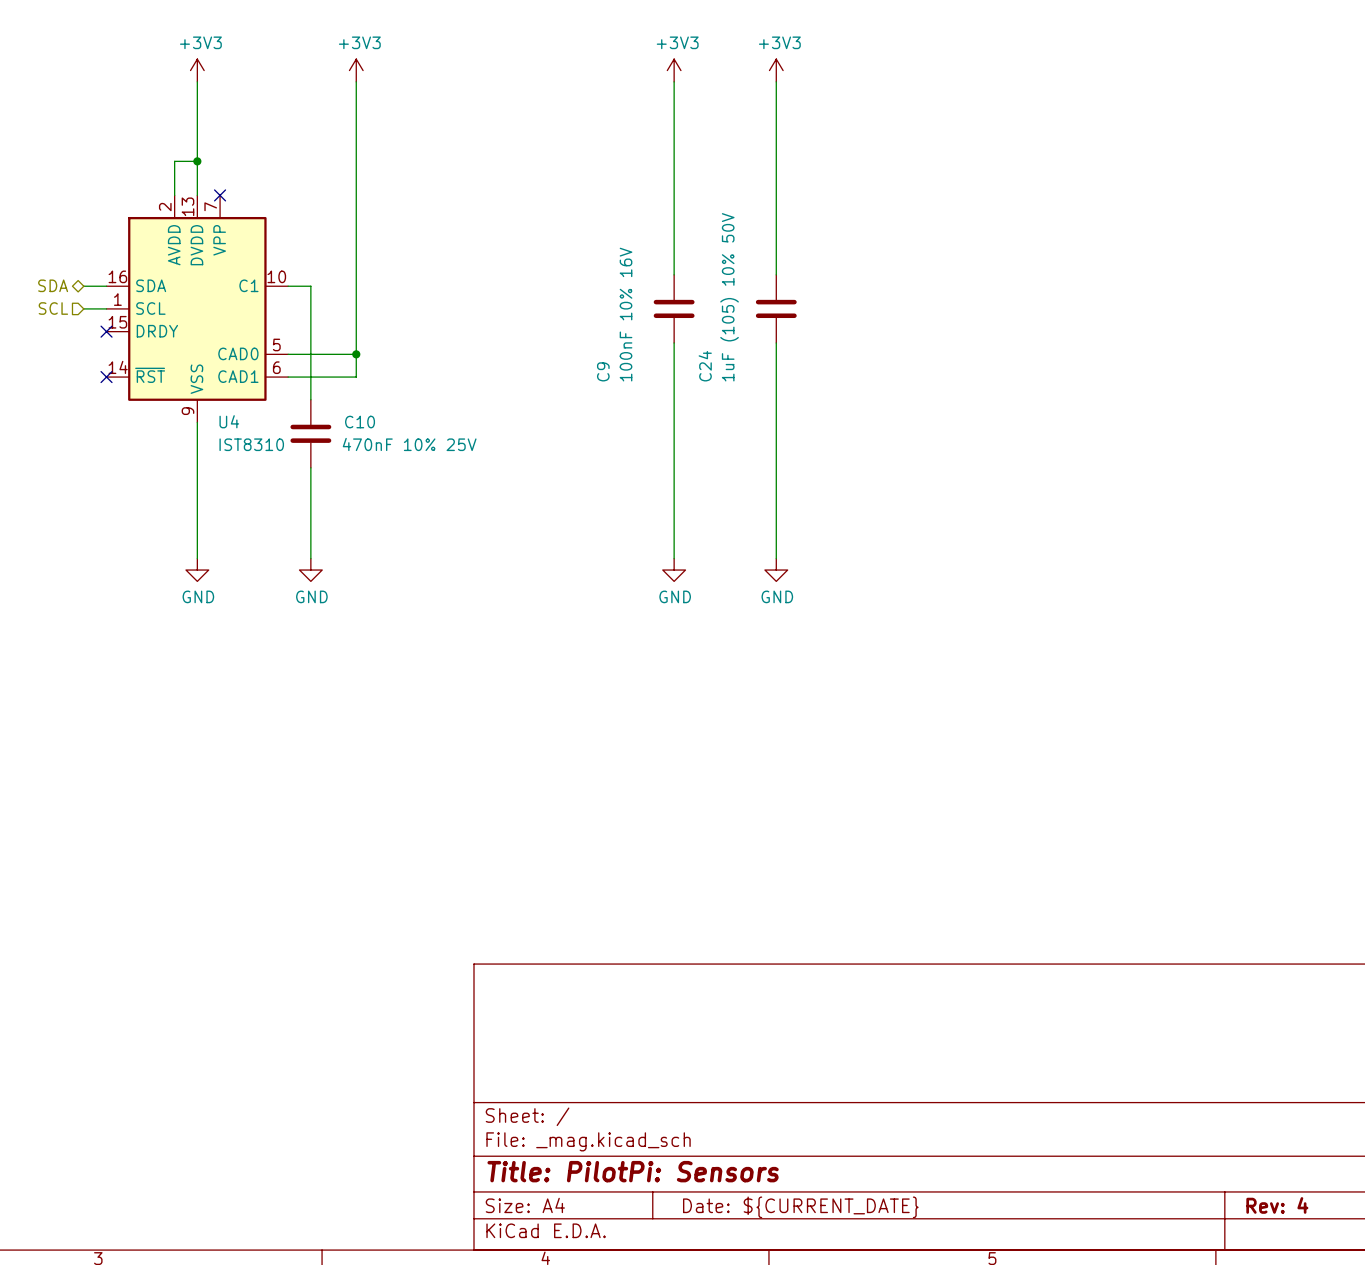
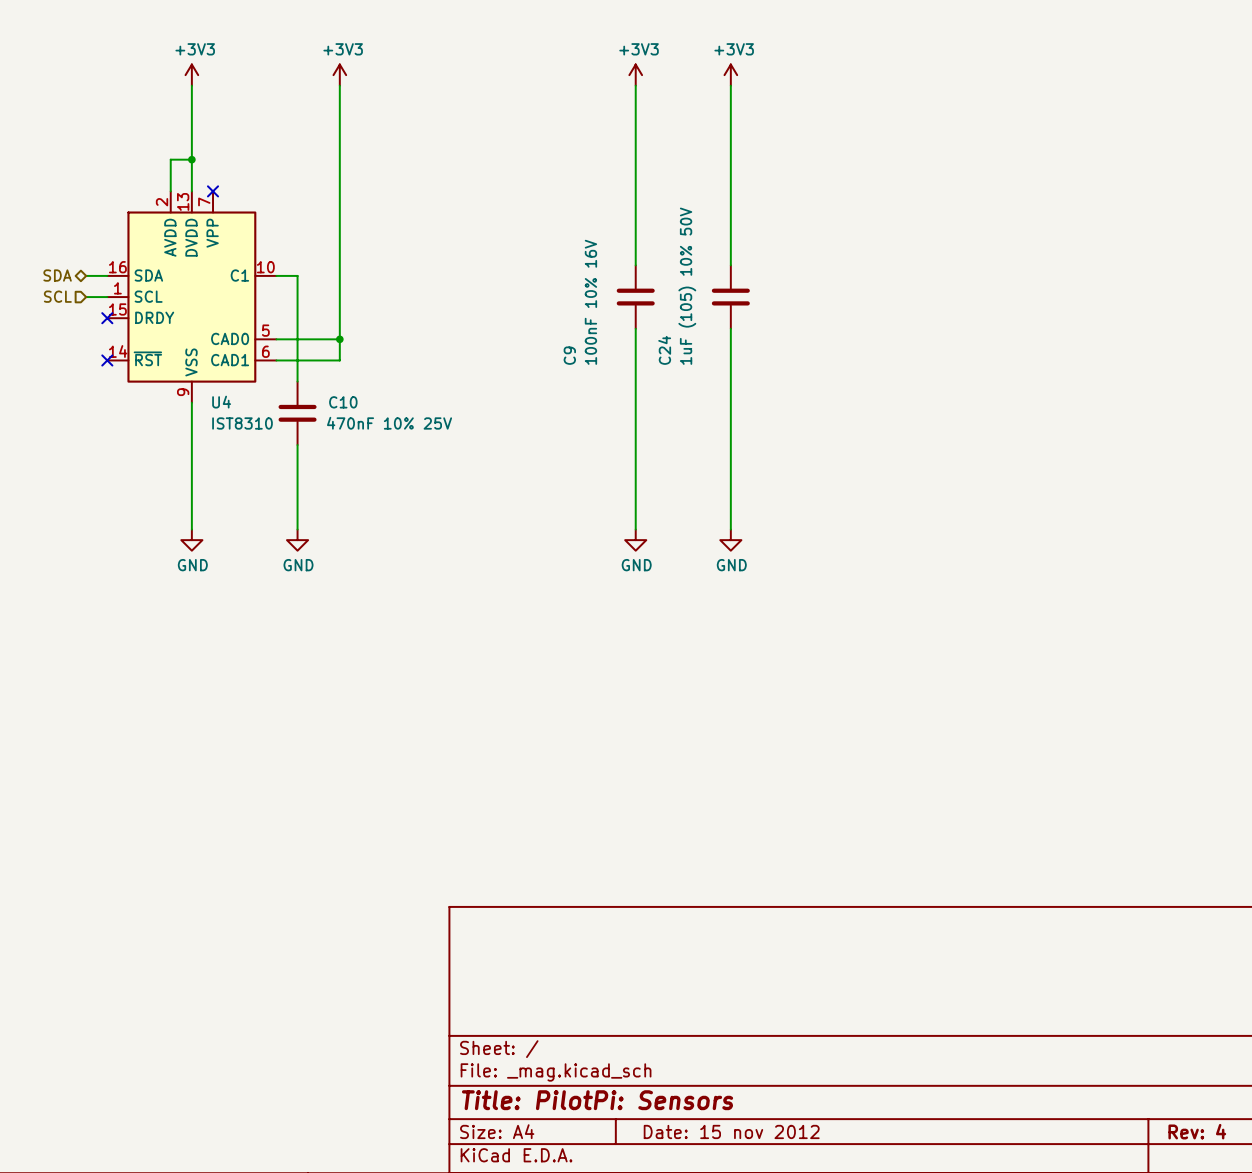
title block: Date: ${CURRENT_DATE} (800, 1207) -> Date: 15 nov 2012 (731, 1131)

